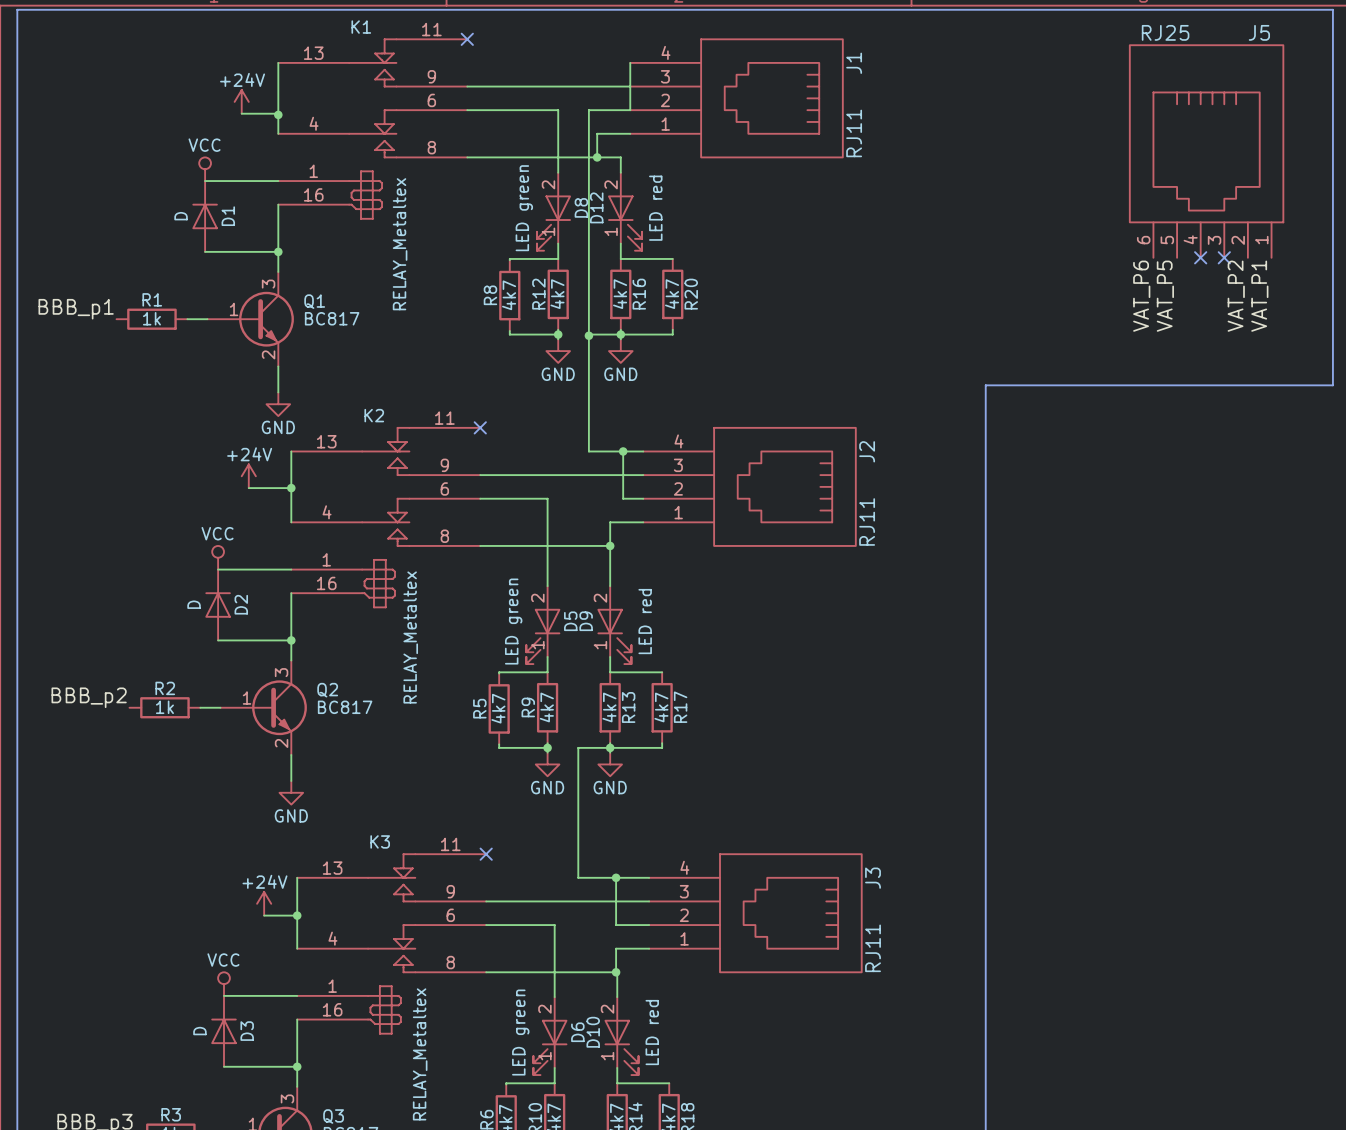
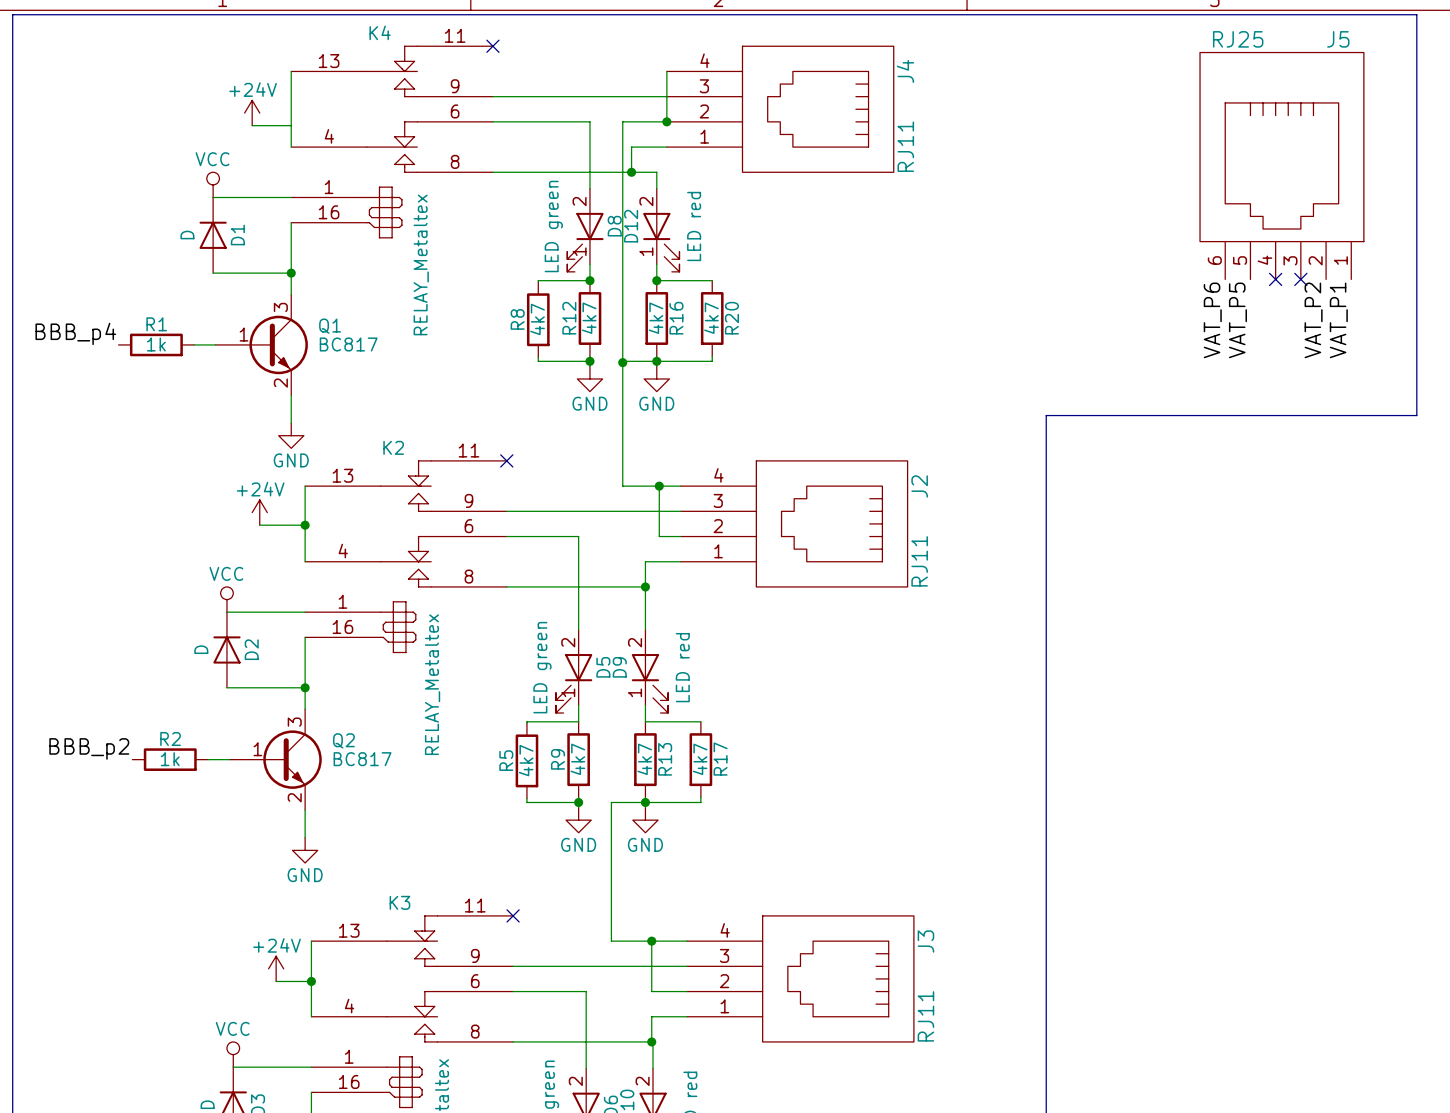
K1 name: K1 (361, 27) -> K4 (380, 32)
J1 name: J1 (854, 63) -> J4 (905, 71)
junction: none -> (666, 121)
junction: (278, 114) -> none
junction: none -> (589, 280)
junction: none -> (656, 280)
label: BBB_p1 (76, 309) -> BBB_p4 (75, 333)

